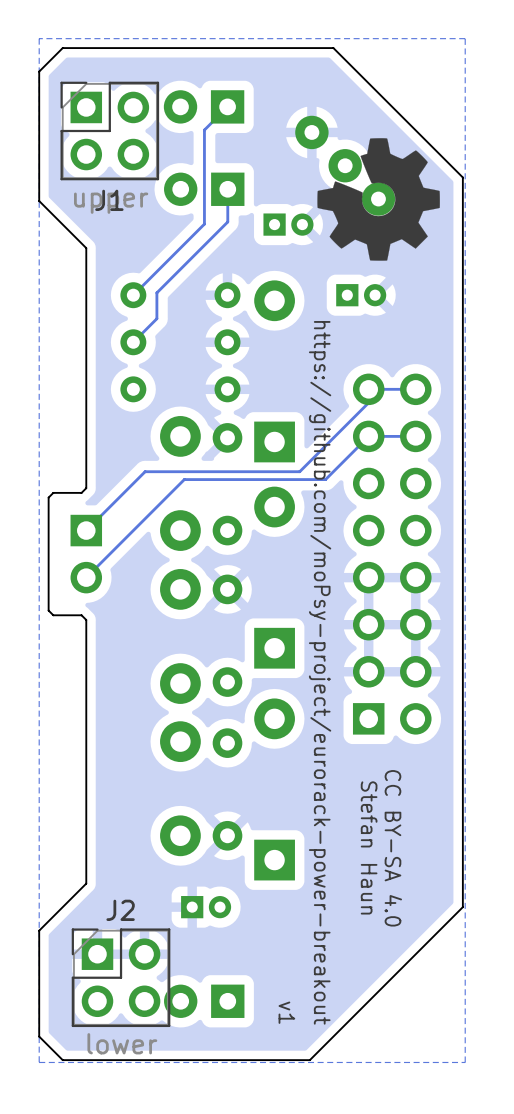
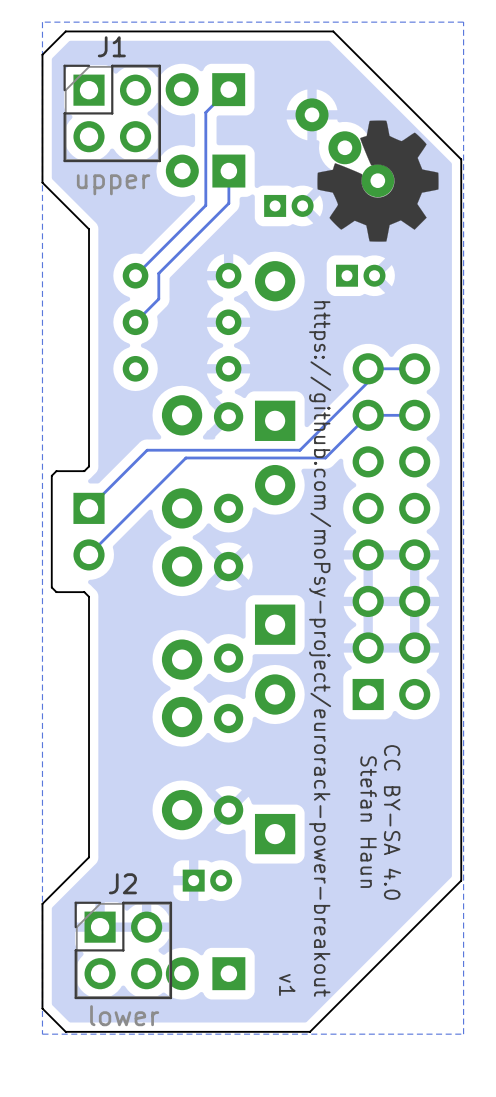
J1 name position: J1 (109, 200) -> J1 (111, 46)

